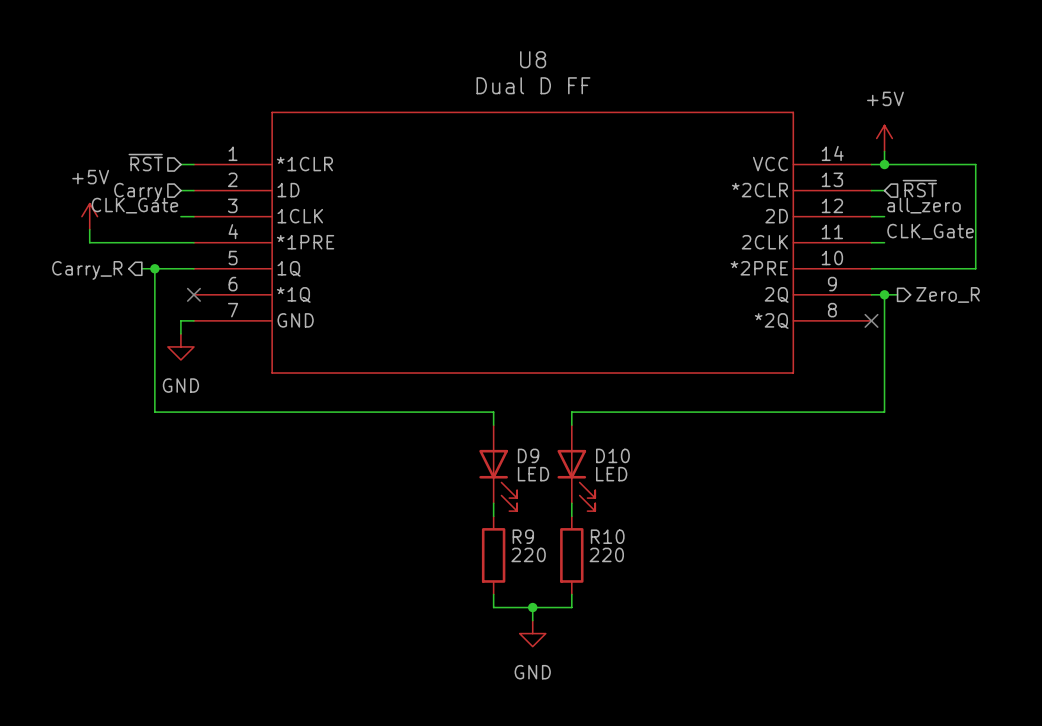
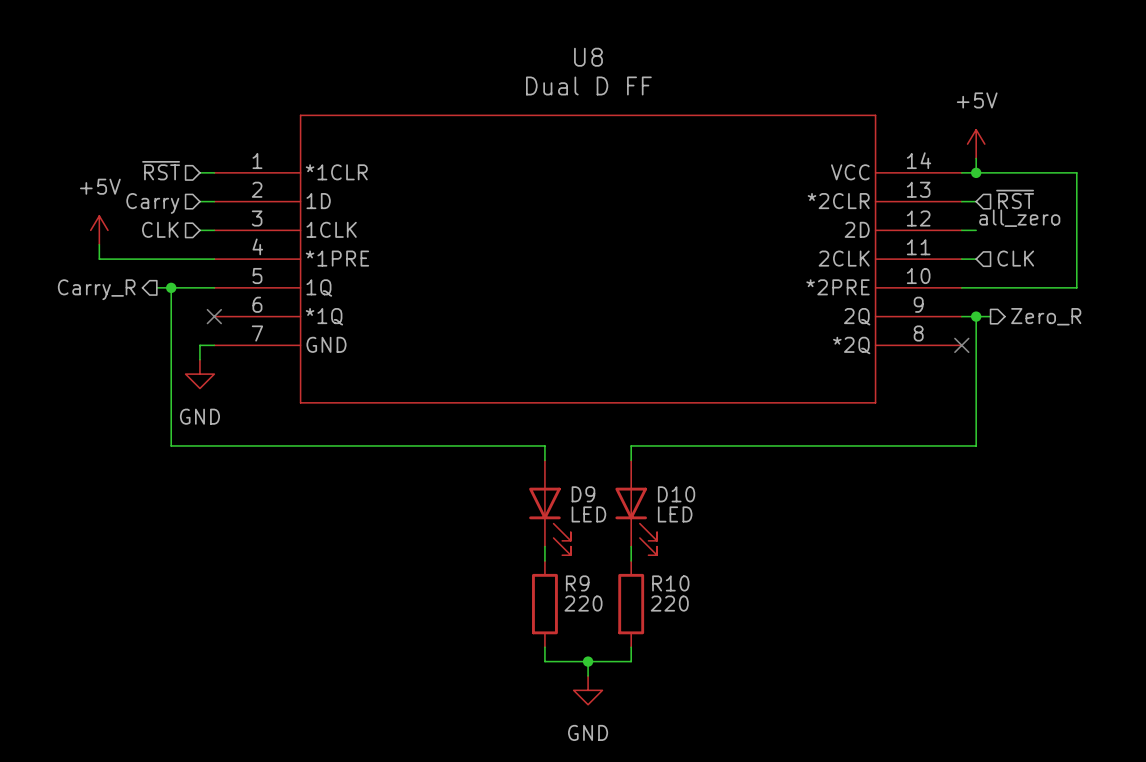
label: CLK_Gate (134, 205) -> none
hierarchical label: none -> CLK (160, 229)
label: CLK_Gate (930, 231) -> none
hierarchical label: none -> CLK (1015, 258)

